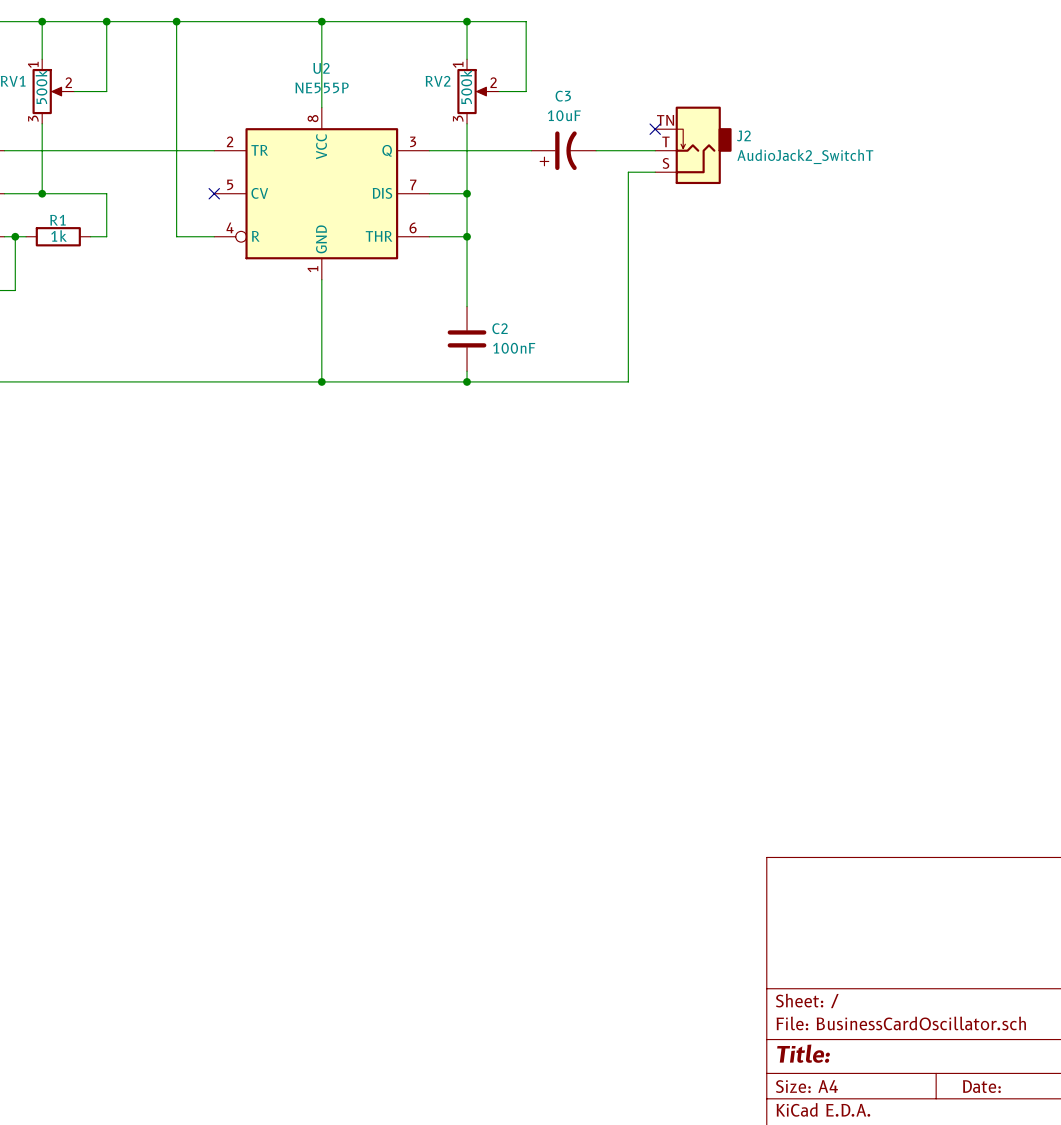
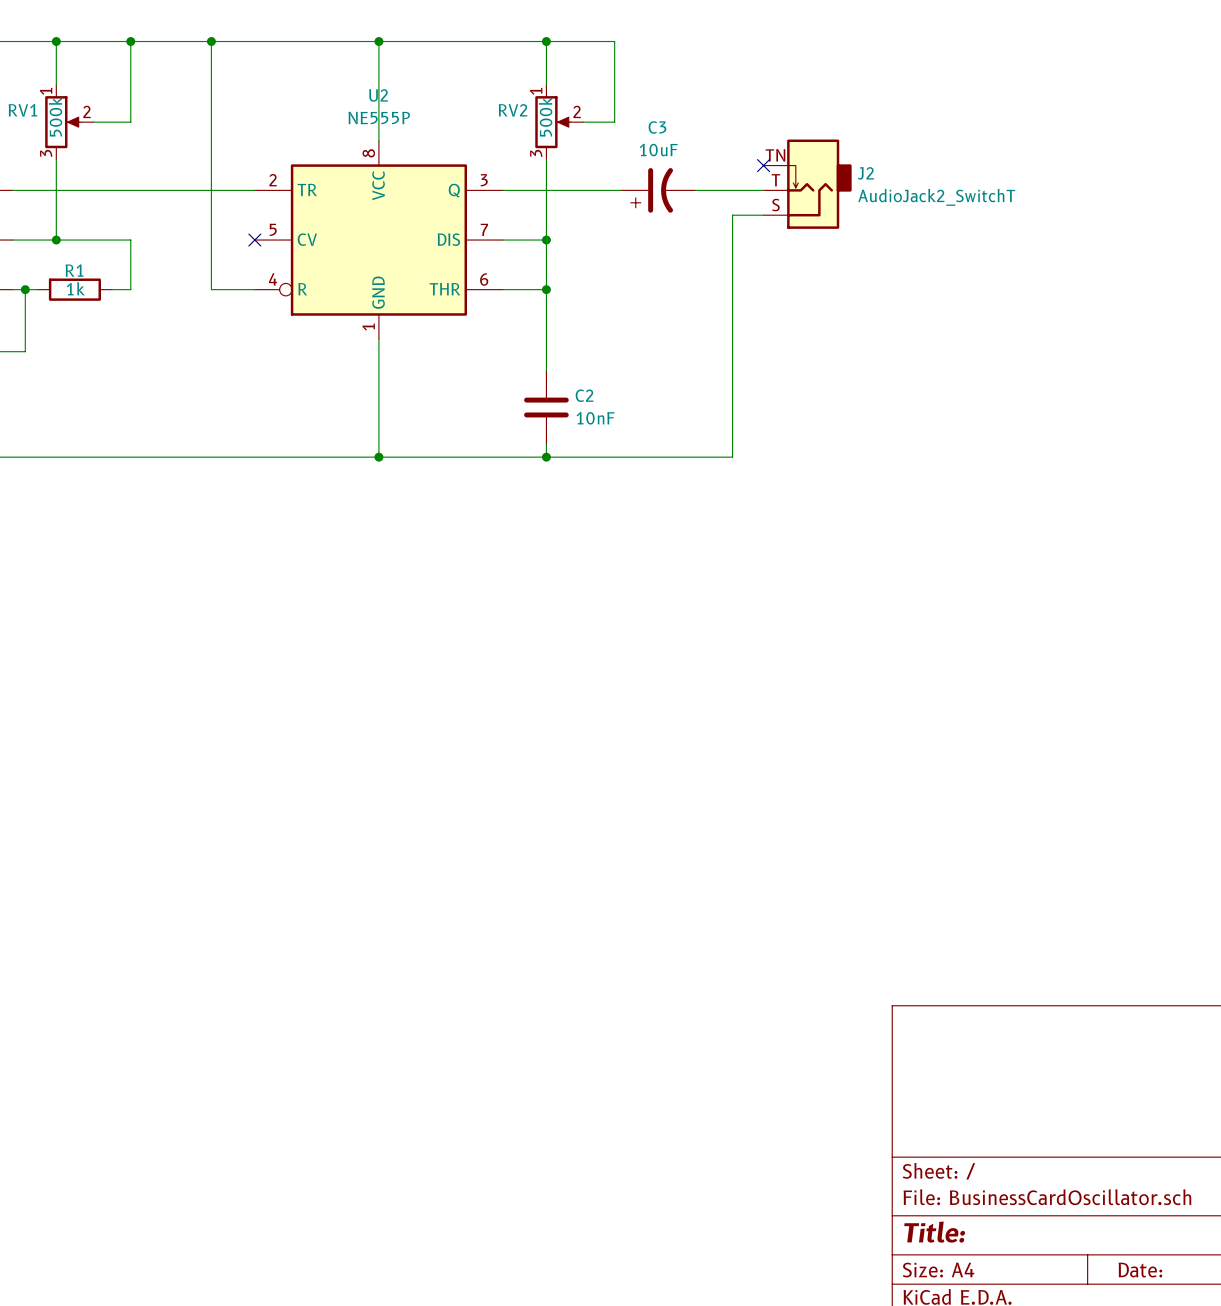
C2 value: 100nF (514, 348) -> 10nF (595, 418)

